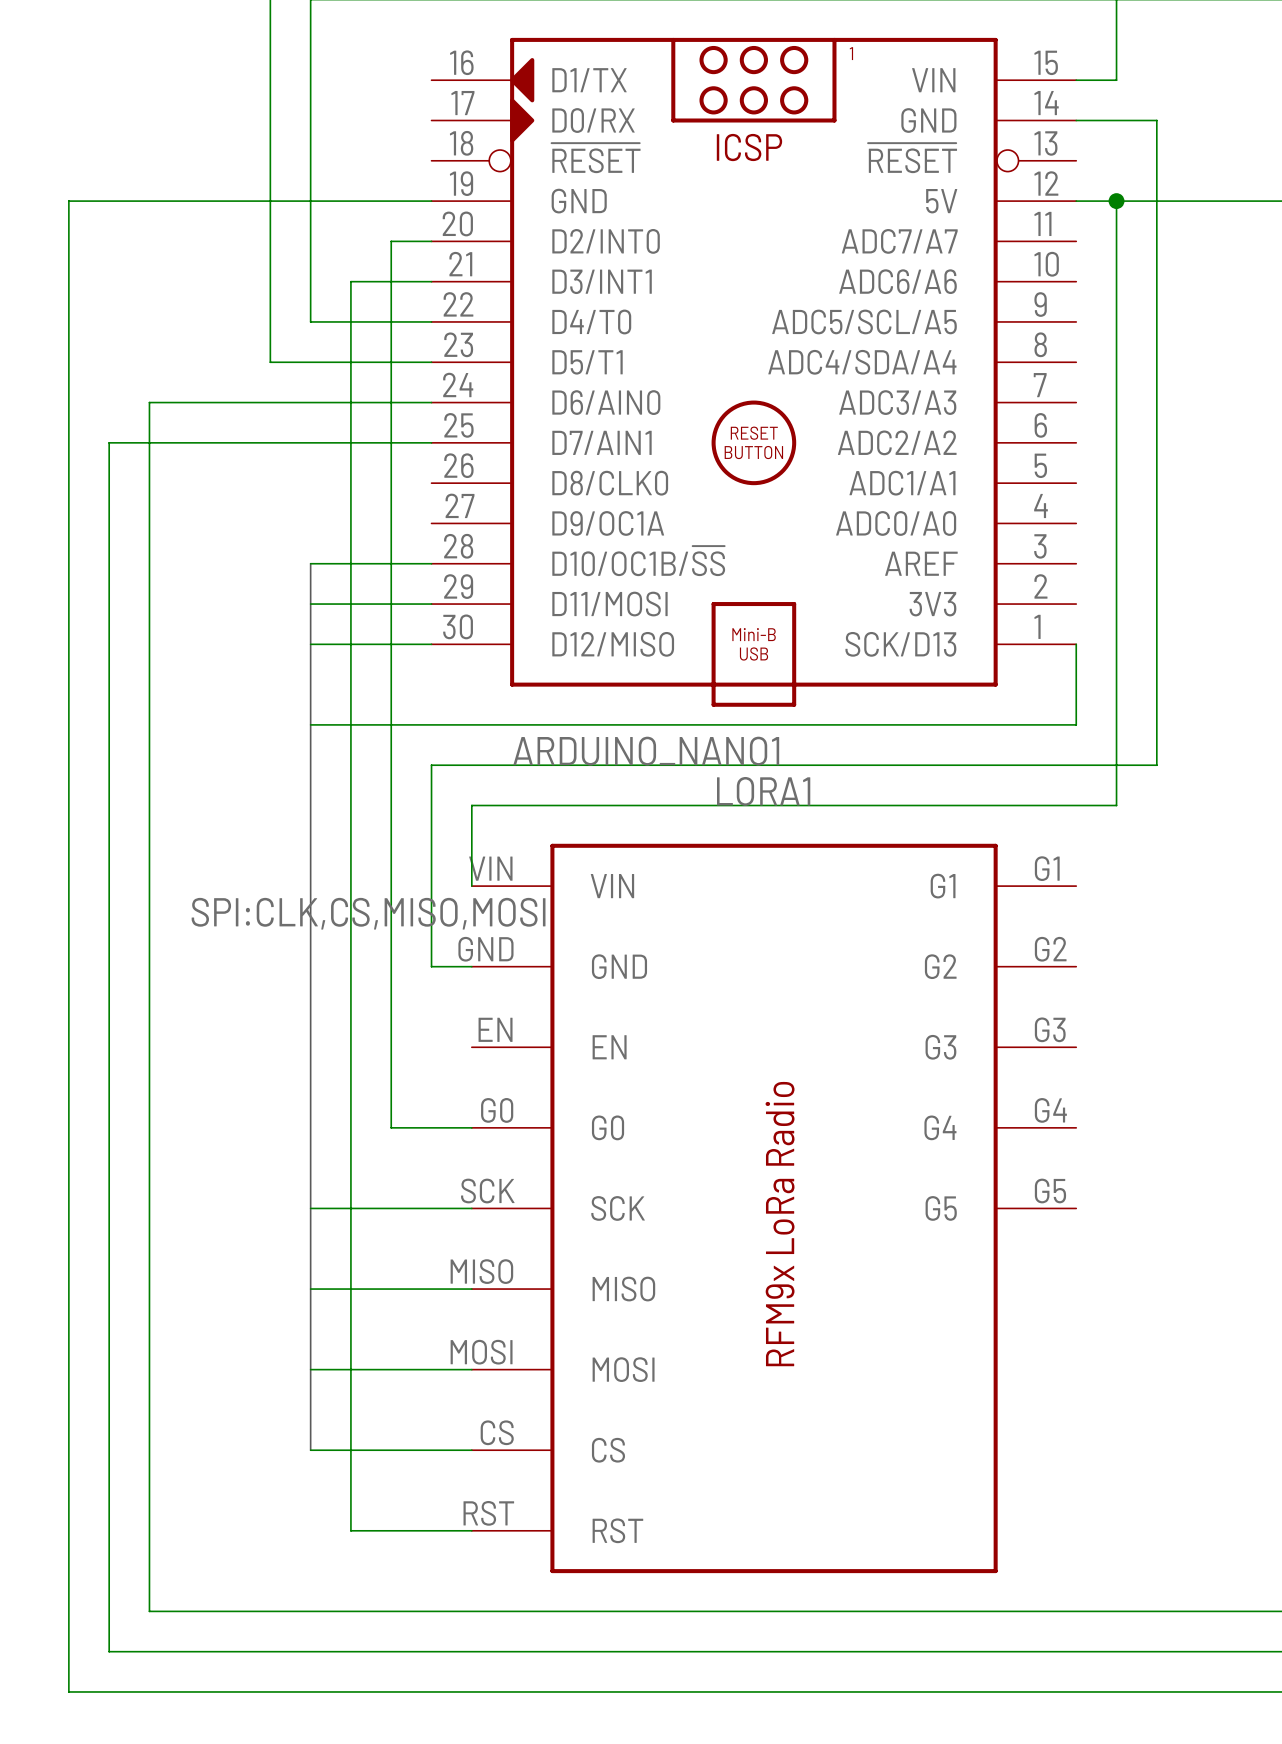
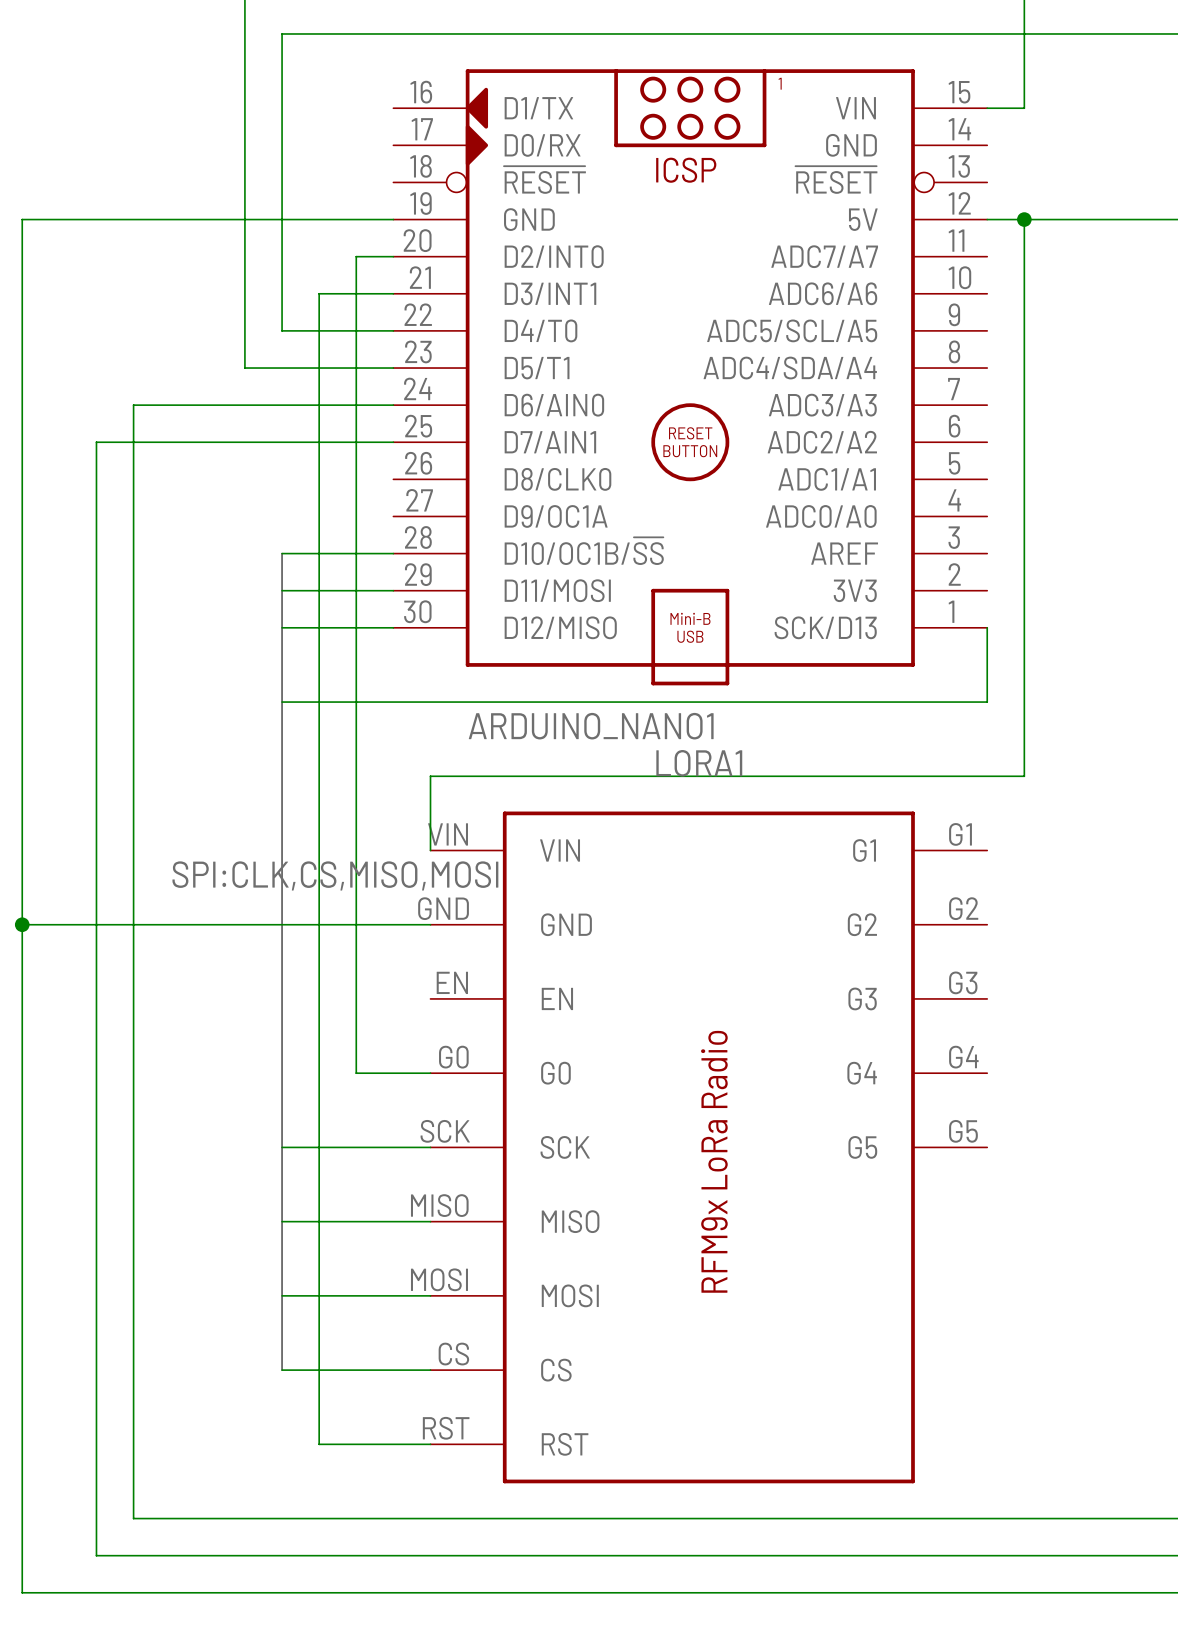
wire: (1076, 120) (1156, 120) (1156, 765) (431, 765) (431, 966) -> (22, 924) (393, 924)
wire: (68, 201) (68, 1691) -> (59, 219) (22, 219) (22, 1592) (59, 1592)
junction: none -> (22, 924)

